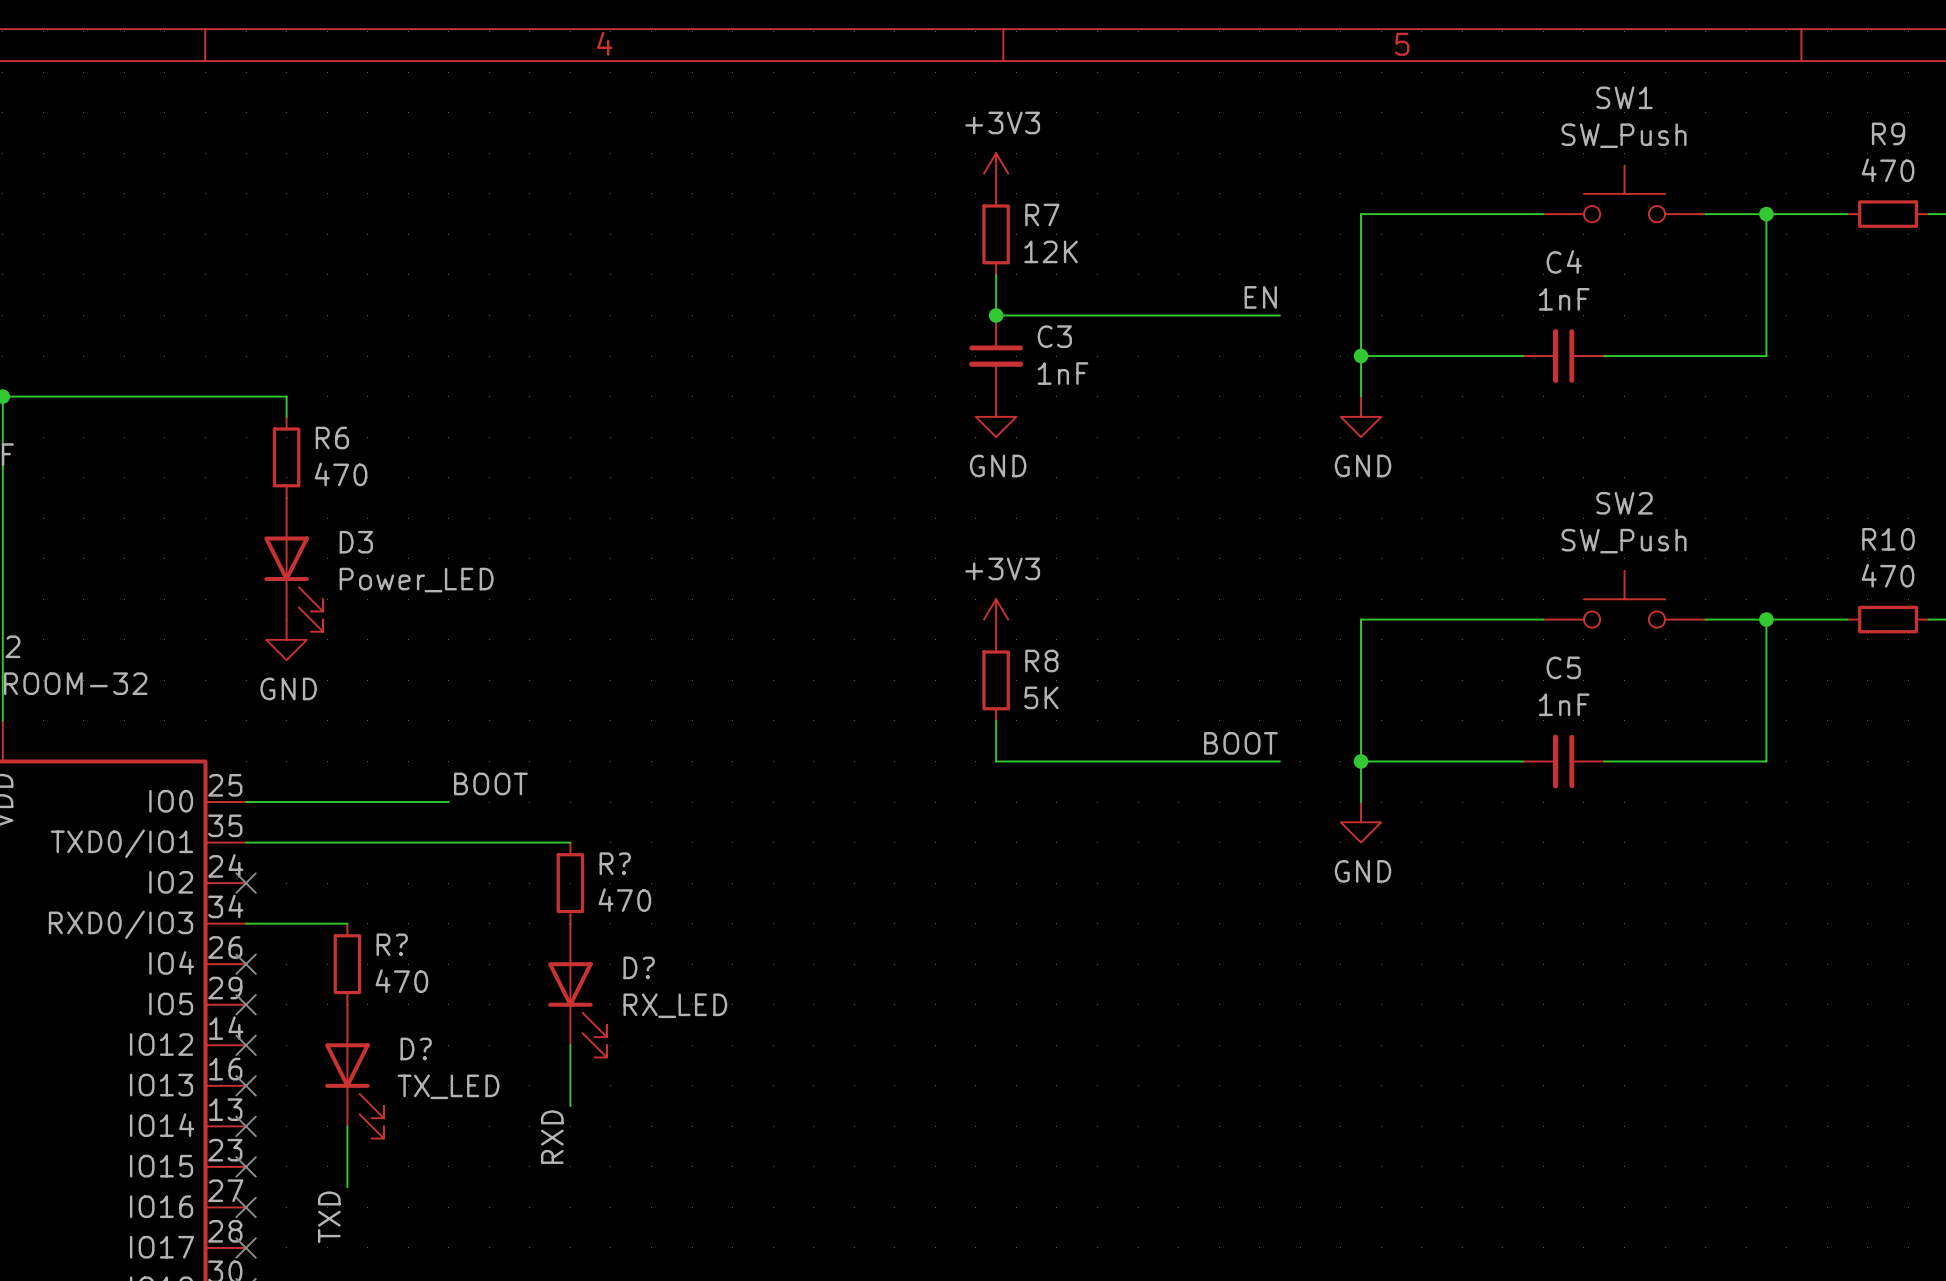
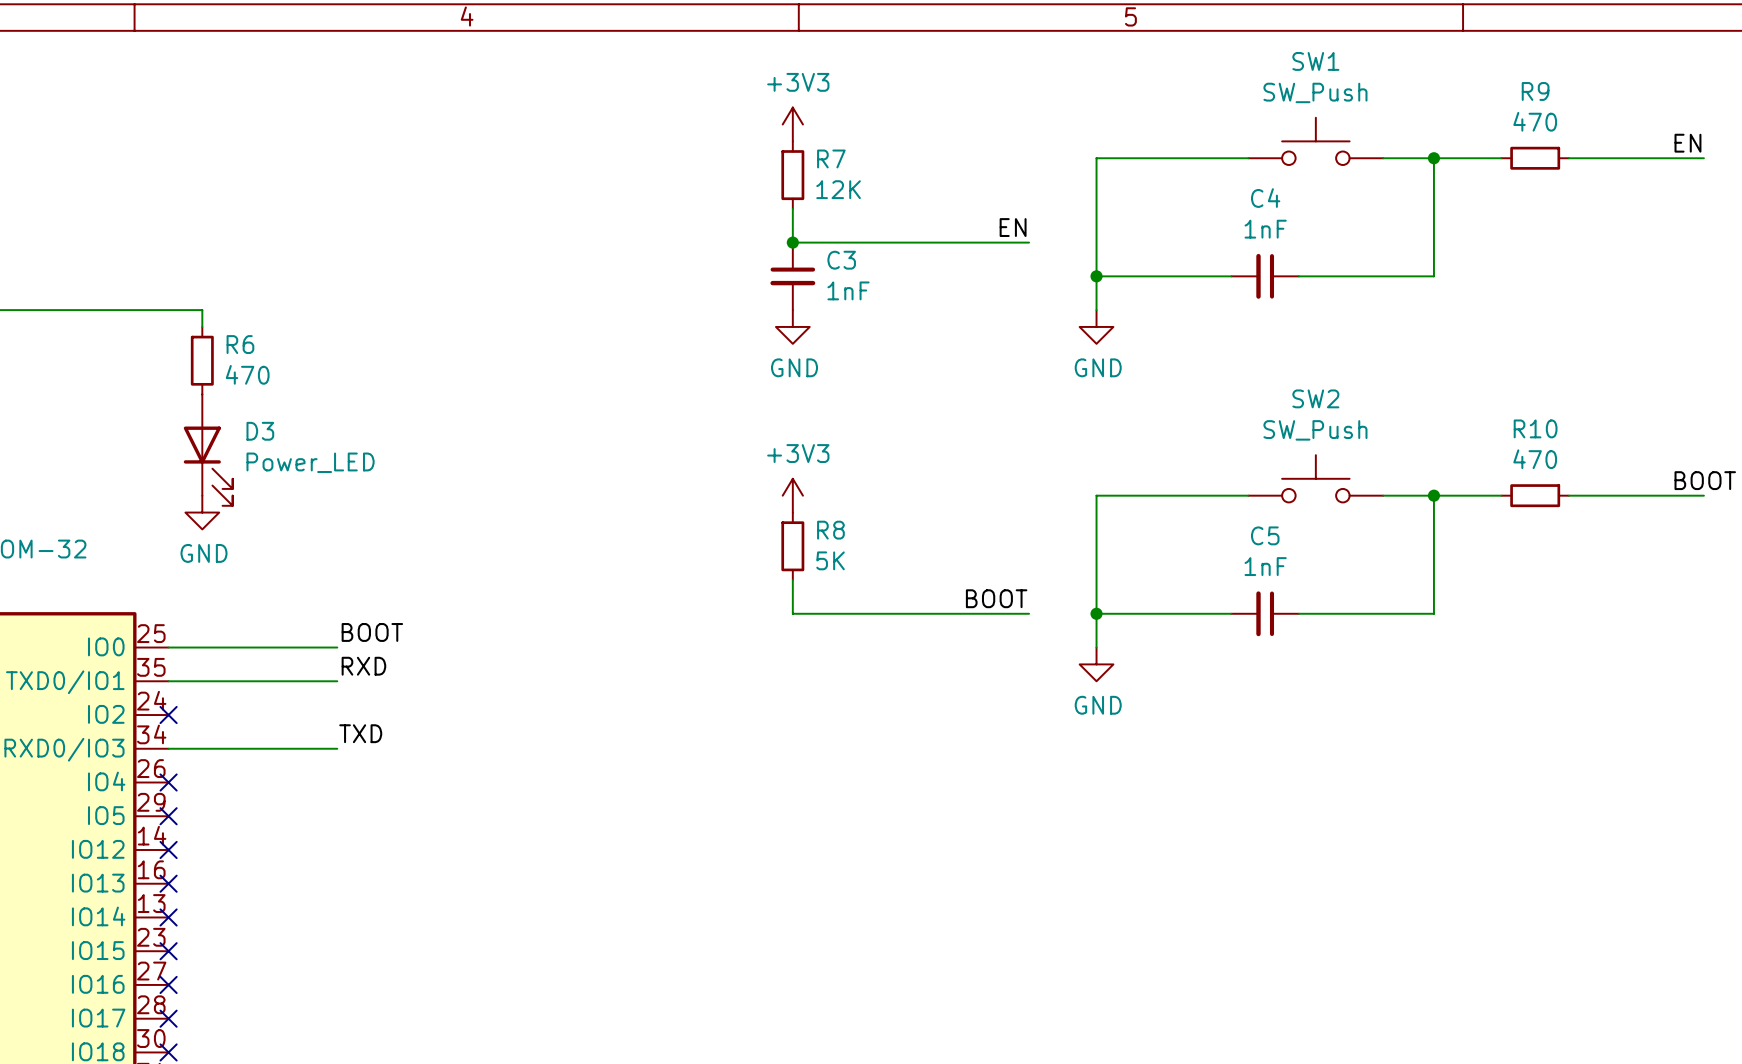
wire: (448, 842) (570, 842) -> none
R?: 470 (570, 883) -> none
wire: none -> (252, 748) (337, 748)
R?: 470 (347, 964) -> none
D?: RX_LED (577, 990) -> none
wire: (570, 1045) (570, 1106) -> none
D?: TX_LED (354, 1071) -> none
wire: (347, 1126) (347, 1187) -> none
label rotation: 0° (552, 1137) -> 90° clockwise (363, 666)
label position: RXD (552, 1137) -> RXD (363, 666)
label rotation: 0° (329, 1217) -> 90° clockwise (360, 733)
label position: TXD (329, 1217) -> TXD (360, 733)

